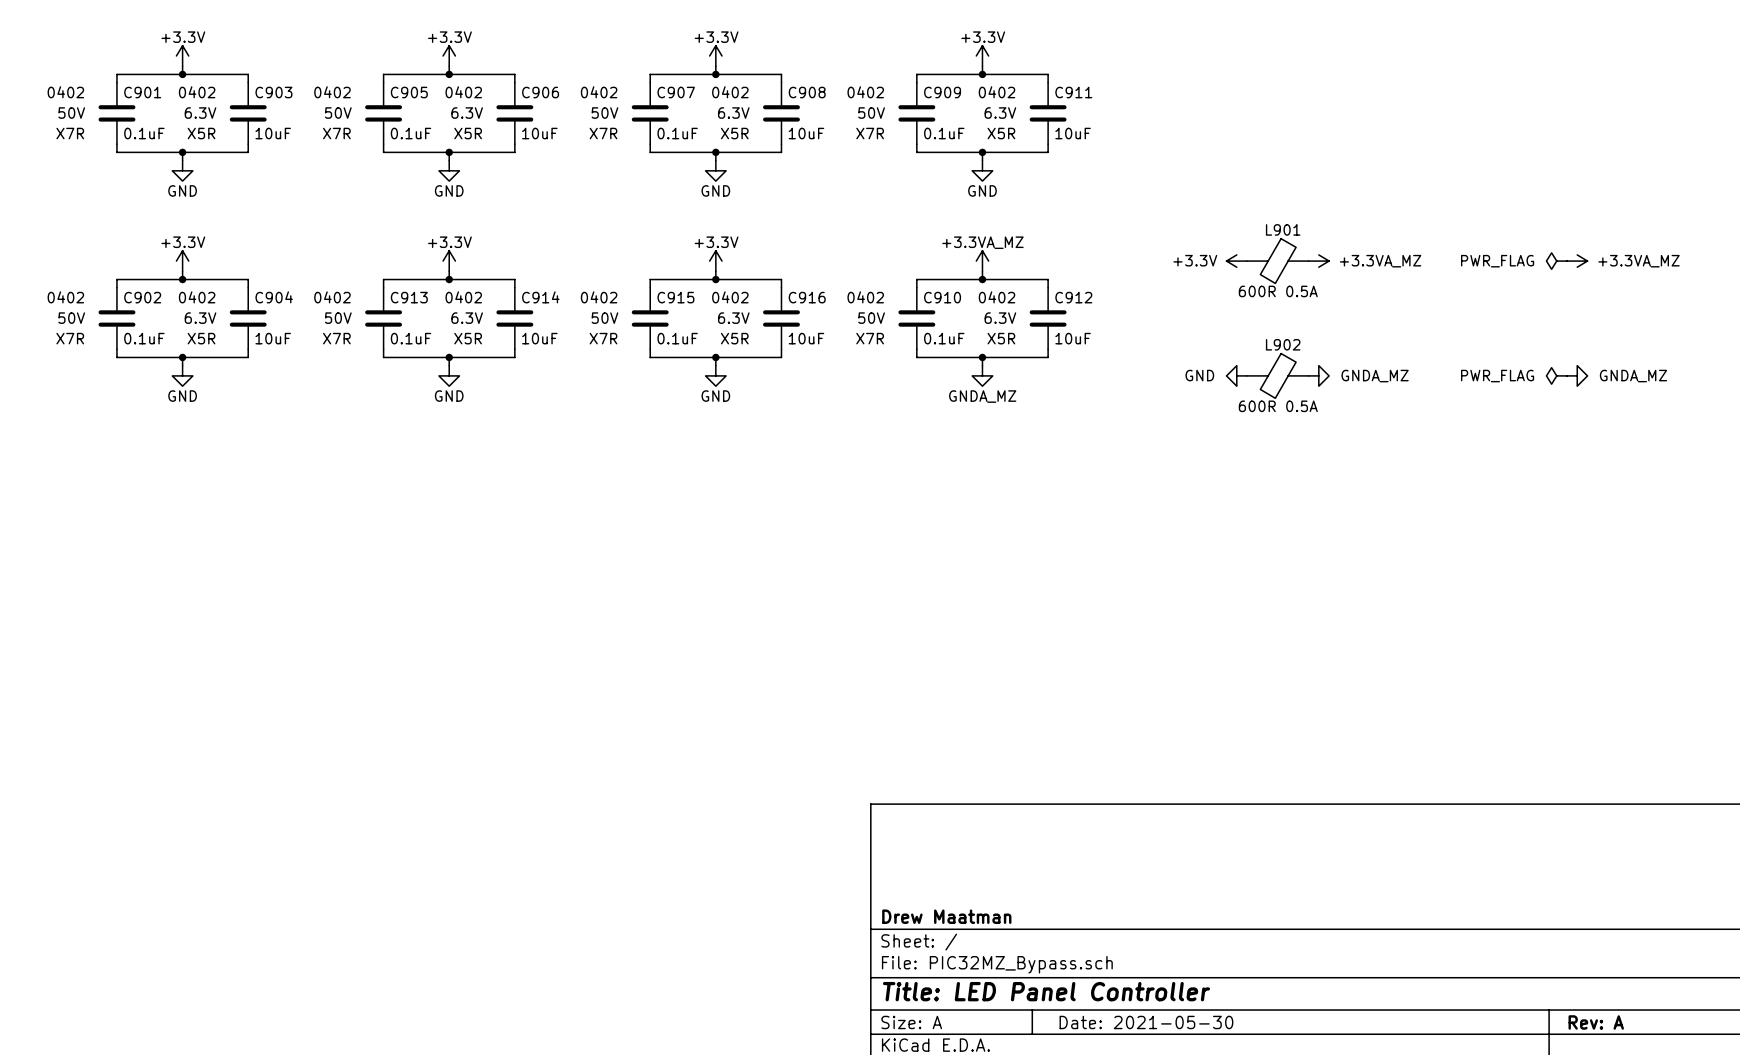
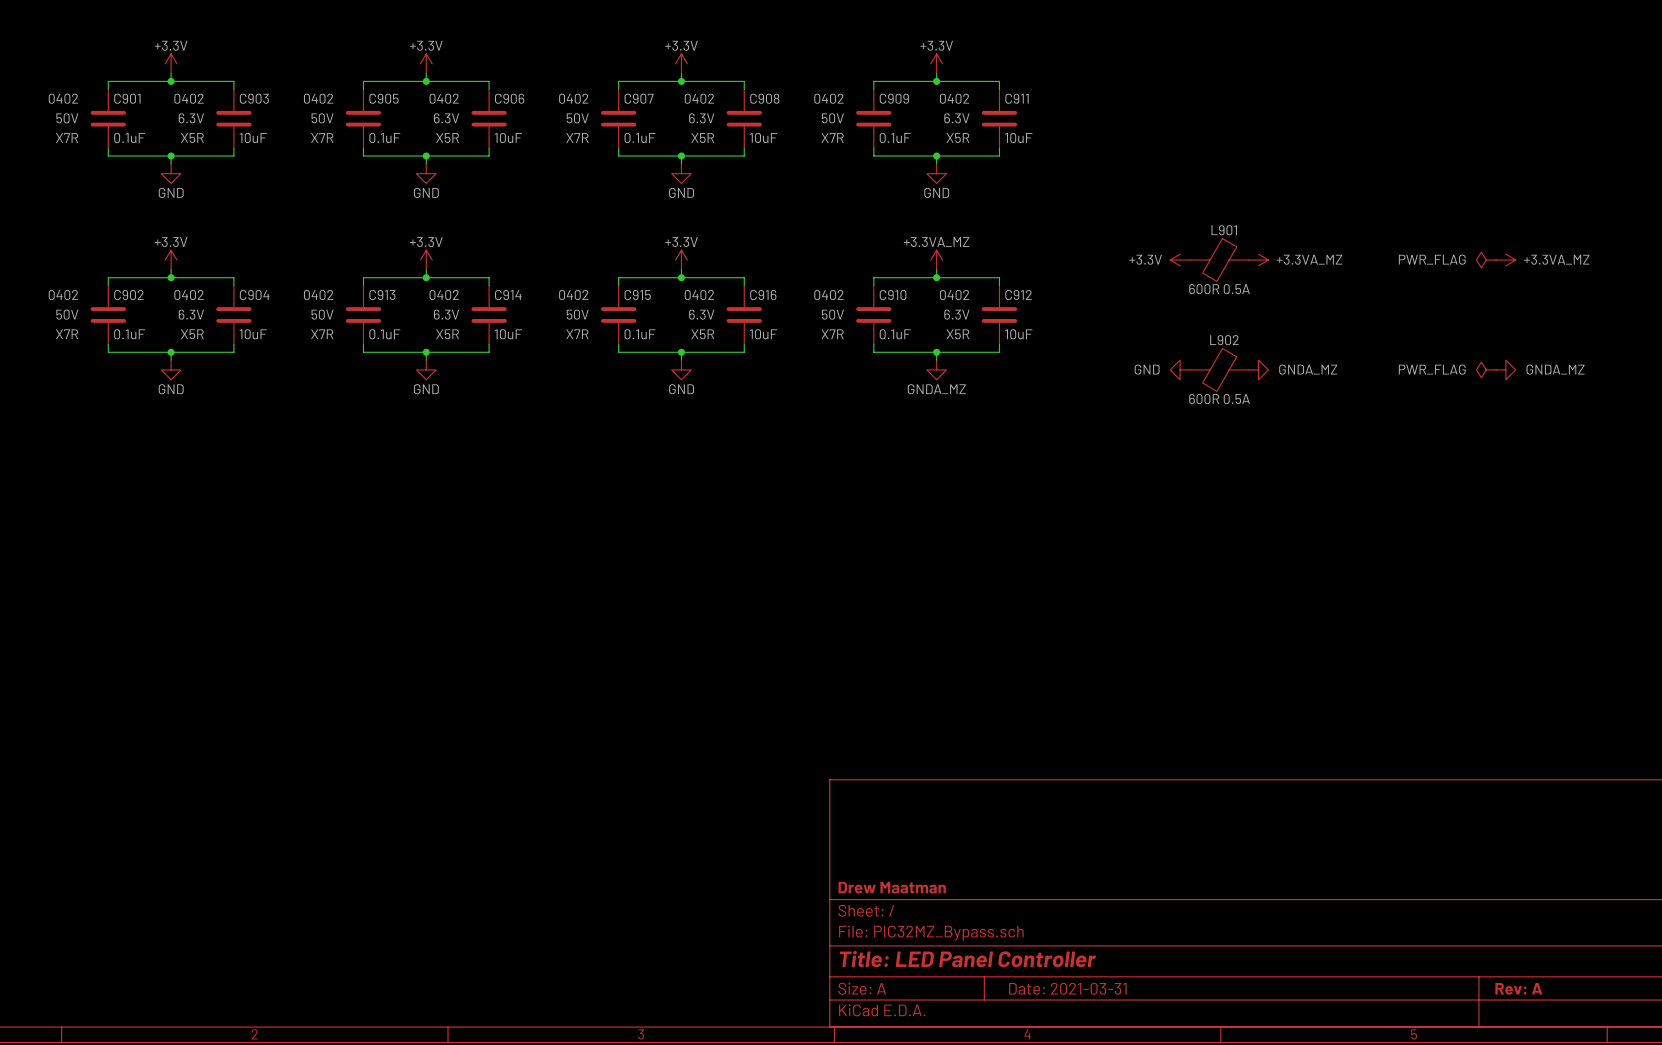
title block: Date: 2021-05-30 (1146, 1022) -> Date: 2021-03-31 (1067, 988)

